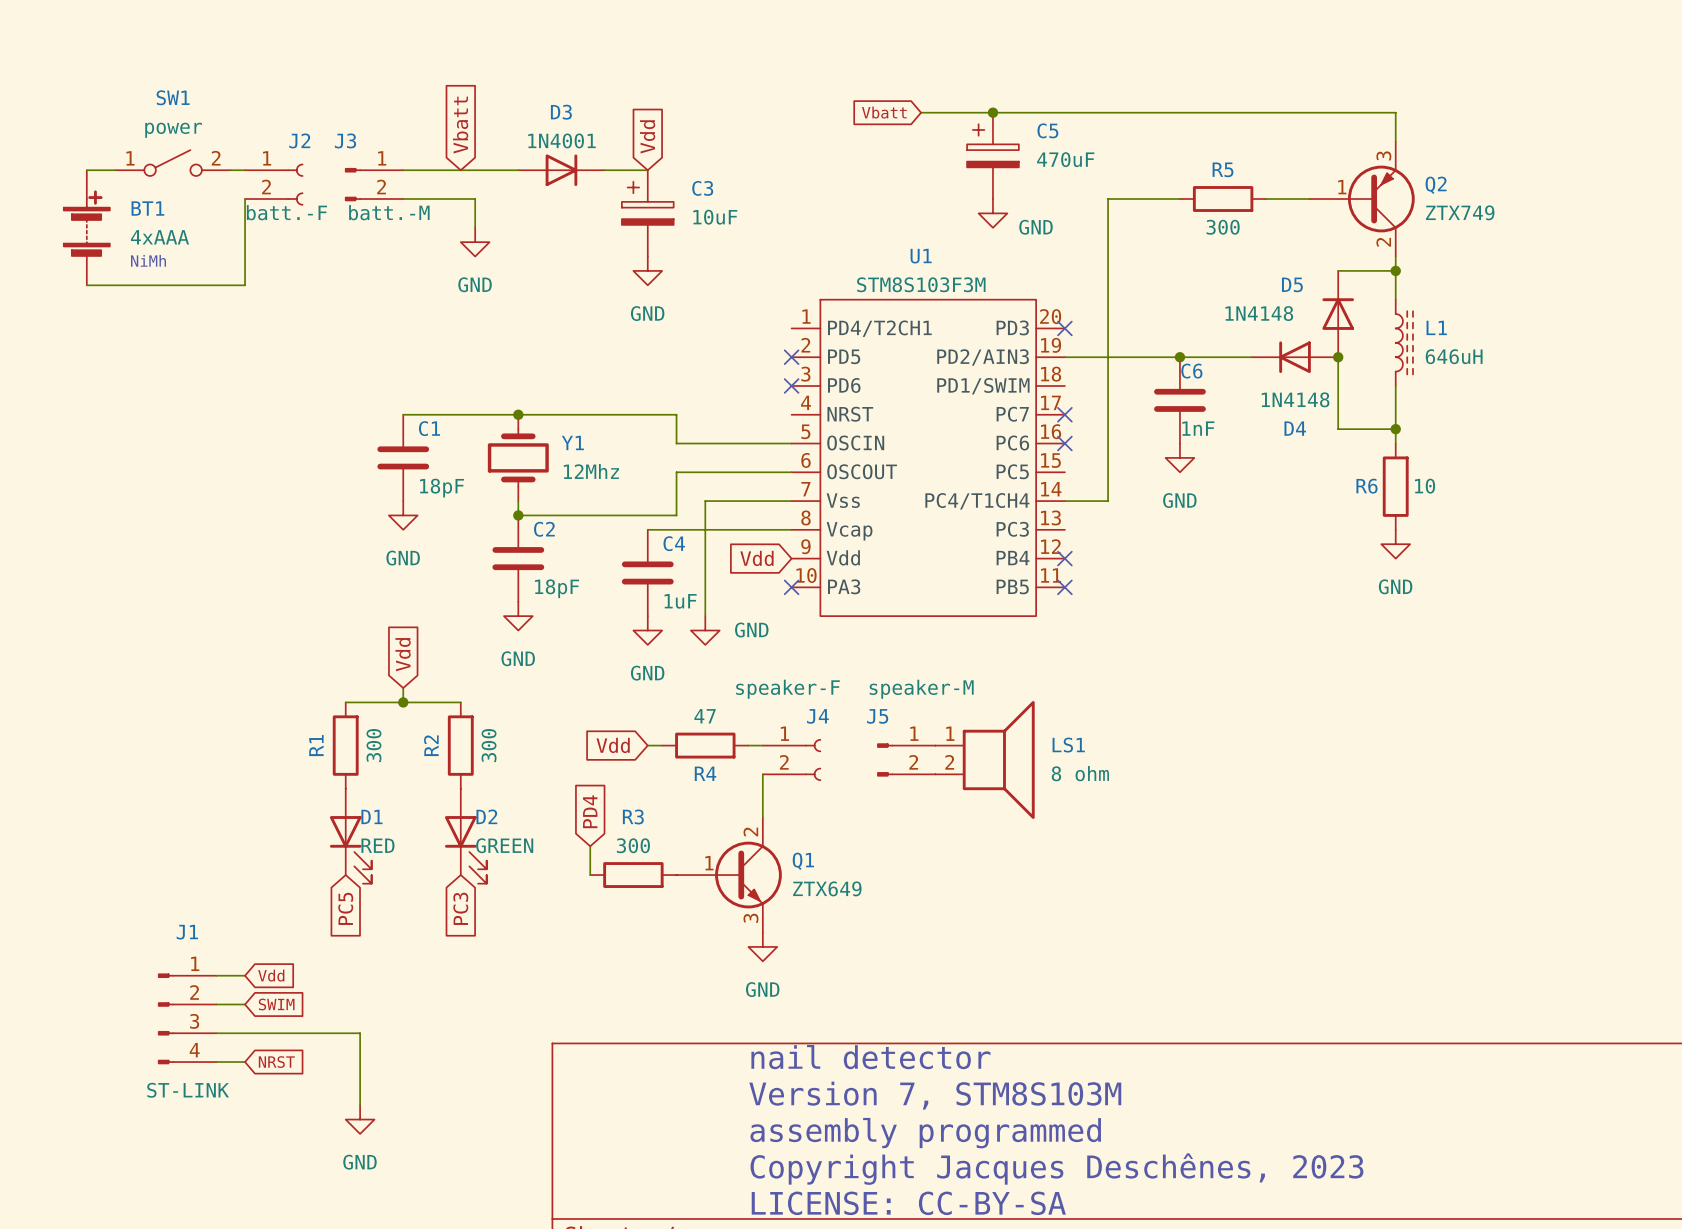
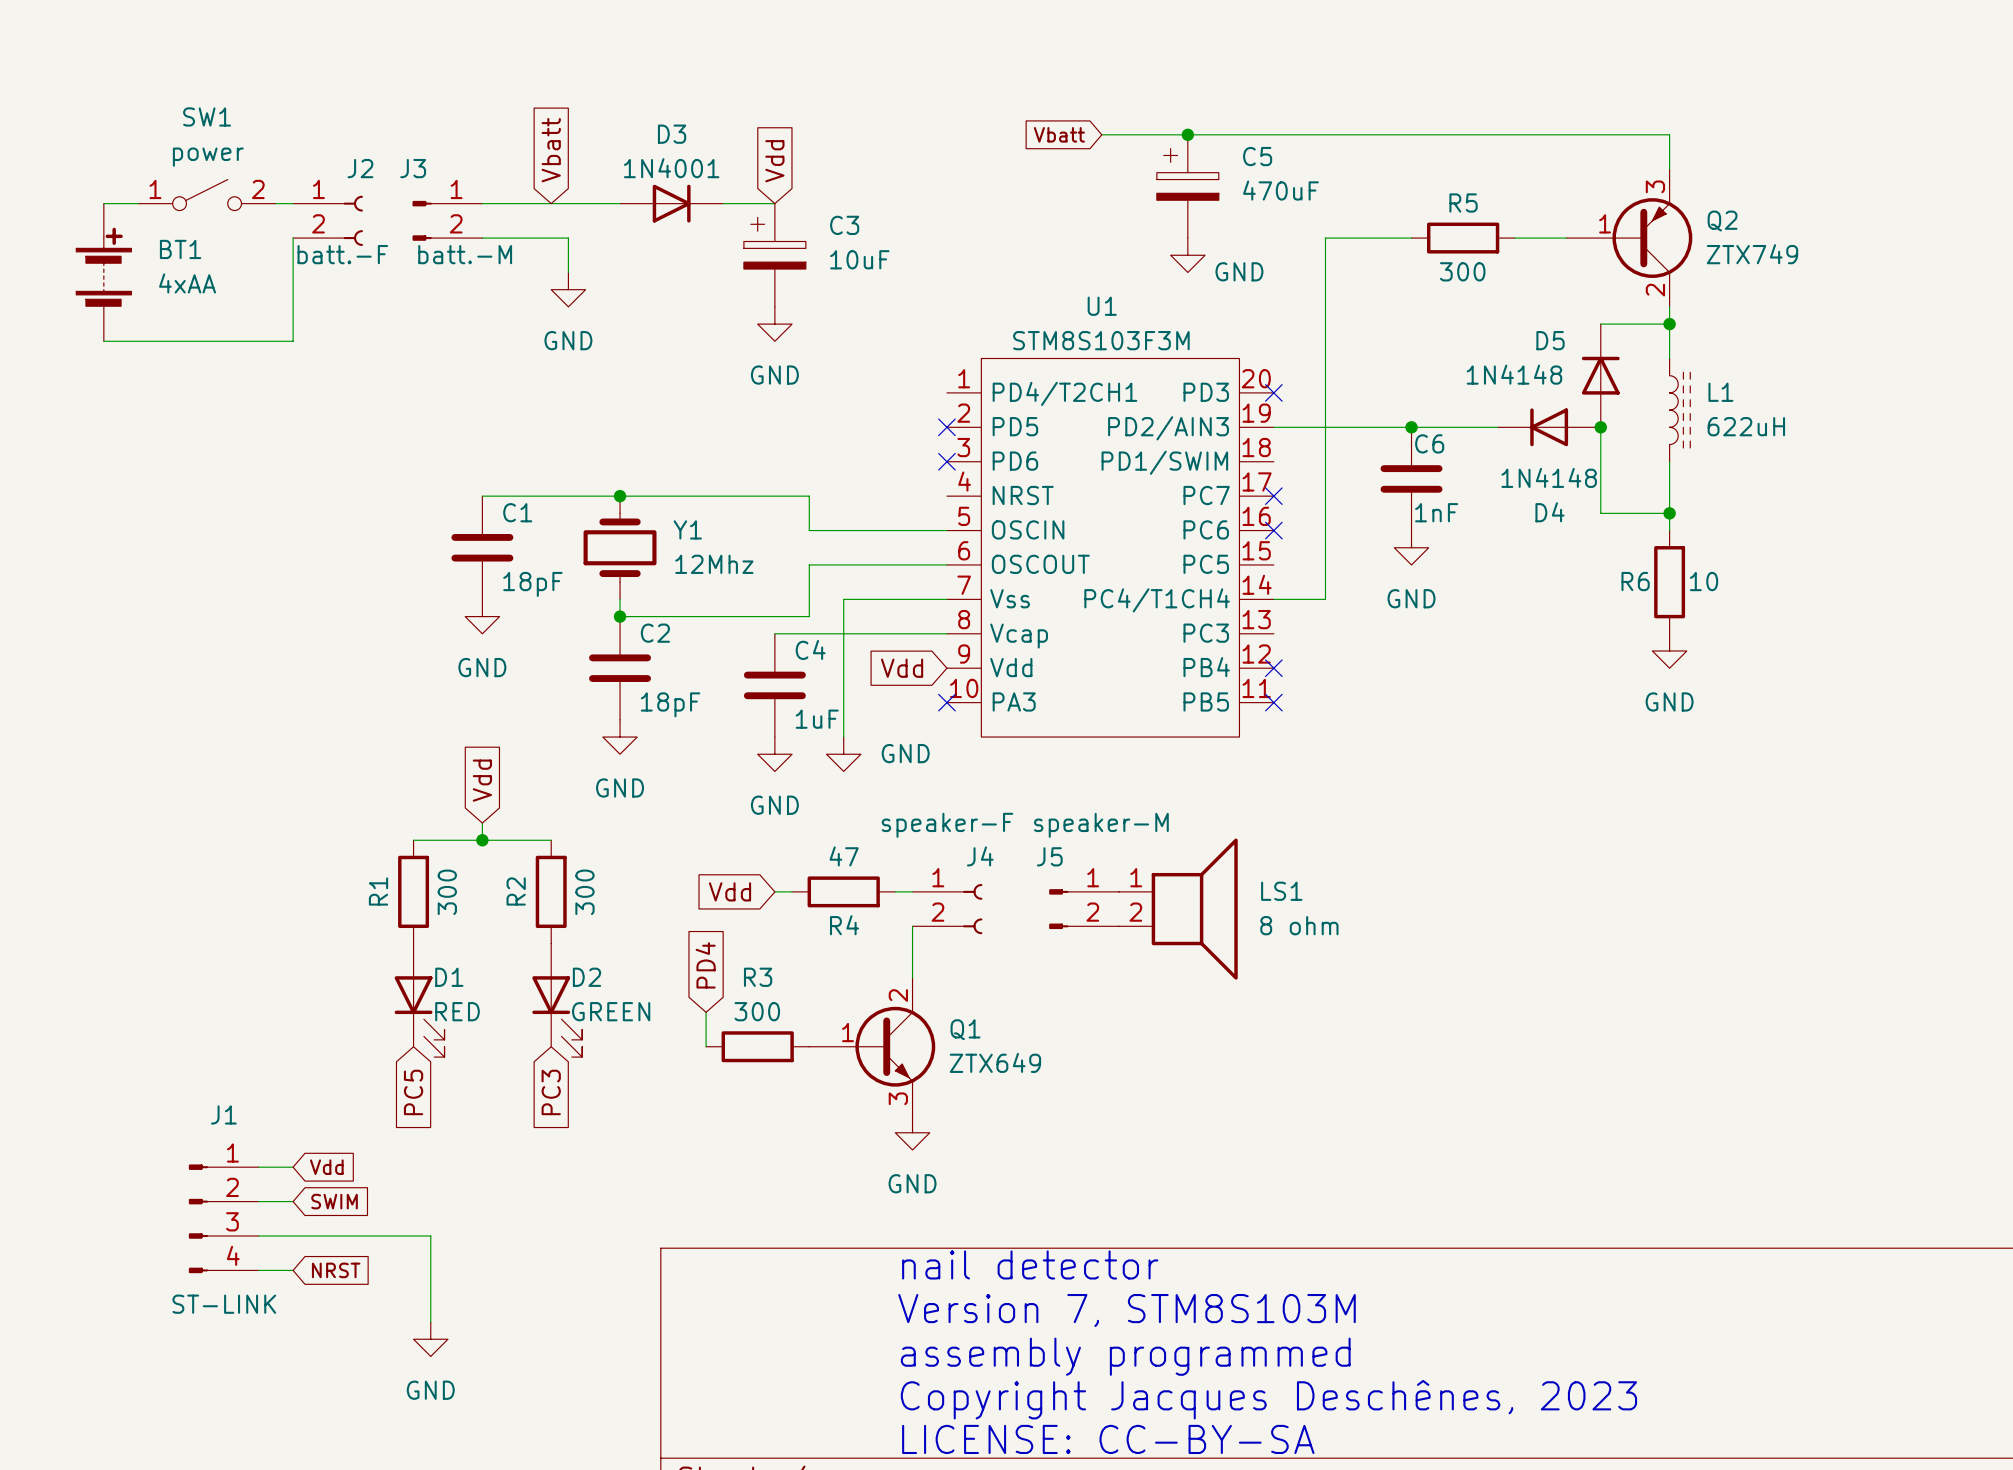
BT1 value: 4xAAA (159, 237) -> 4xAA (187, 283)
text: NiMh (148, 260) -> none
L1 value: 646uH (1454, 356) -> 622uH (1746, 426)

